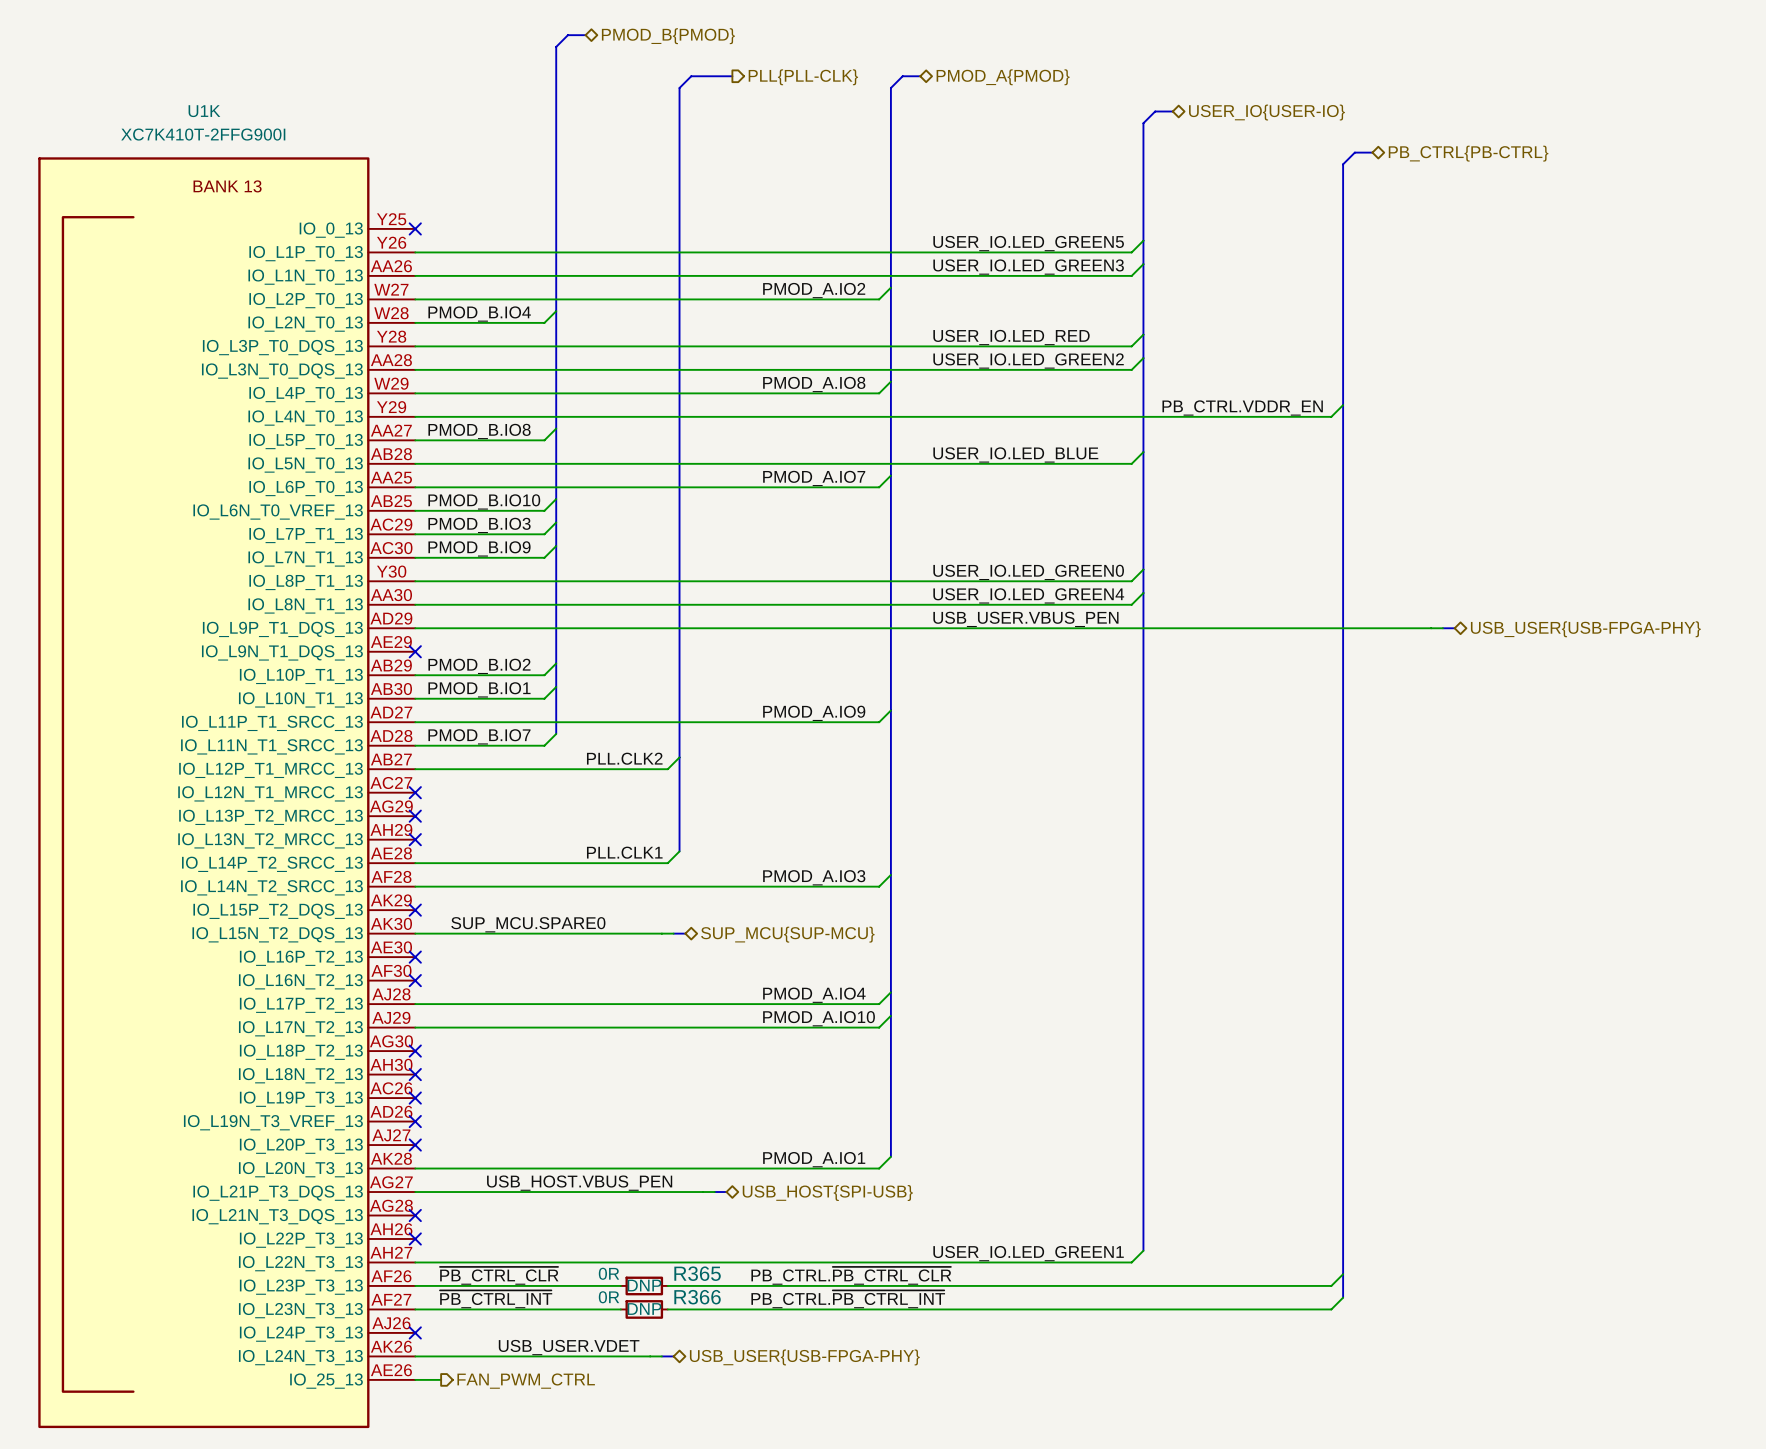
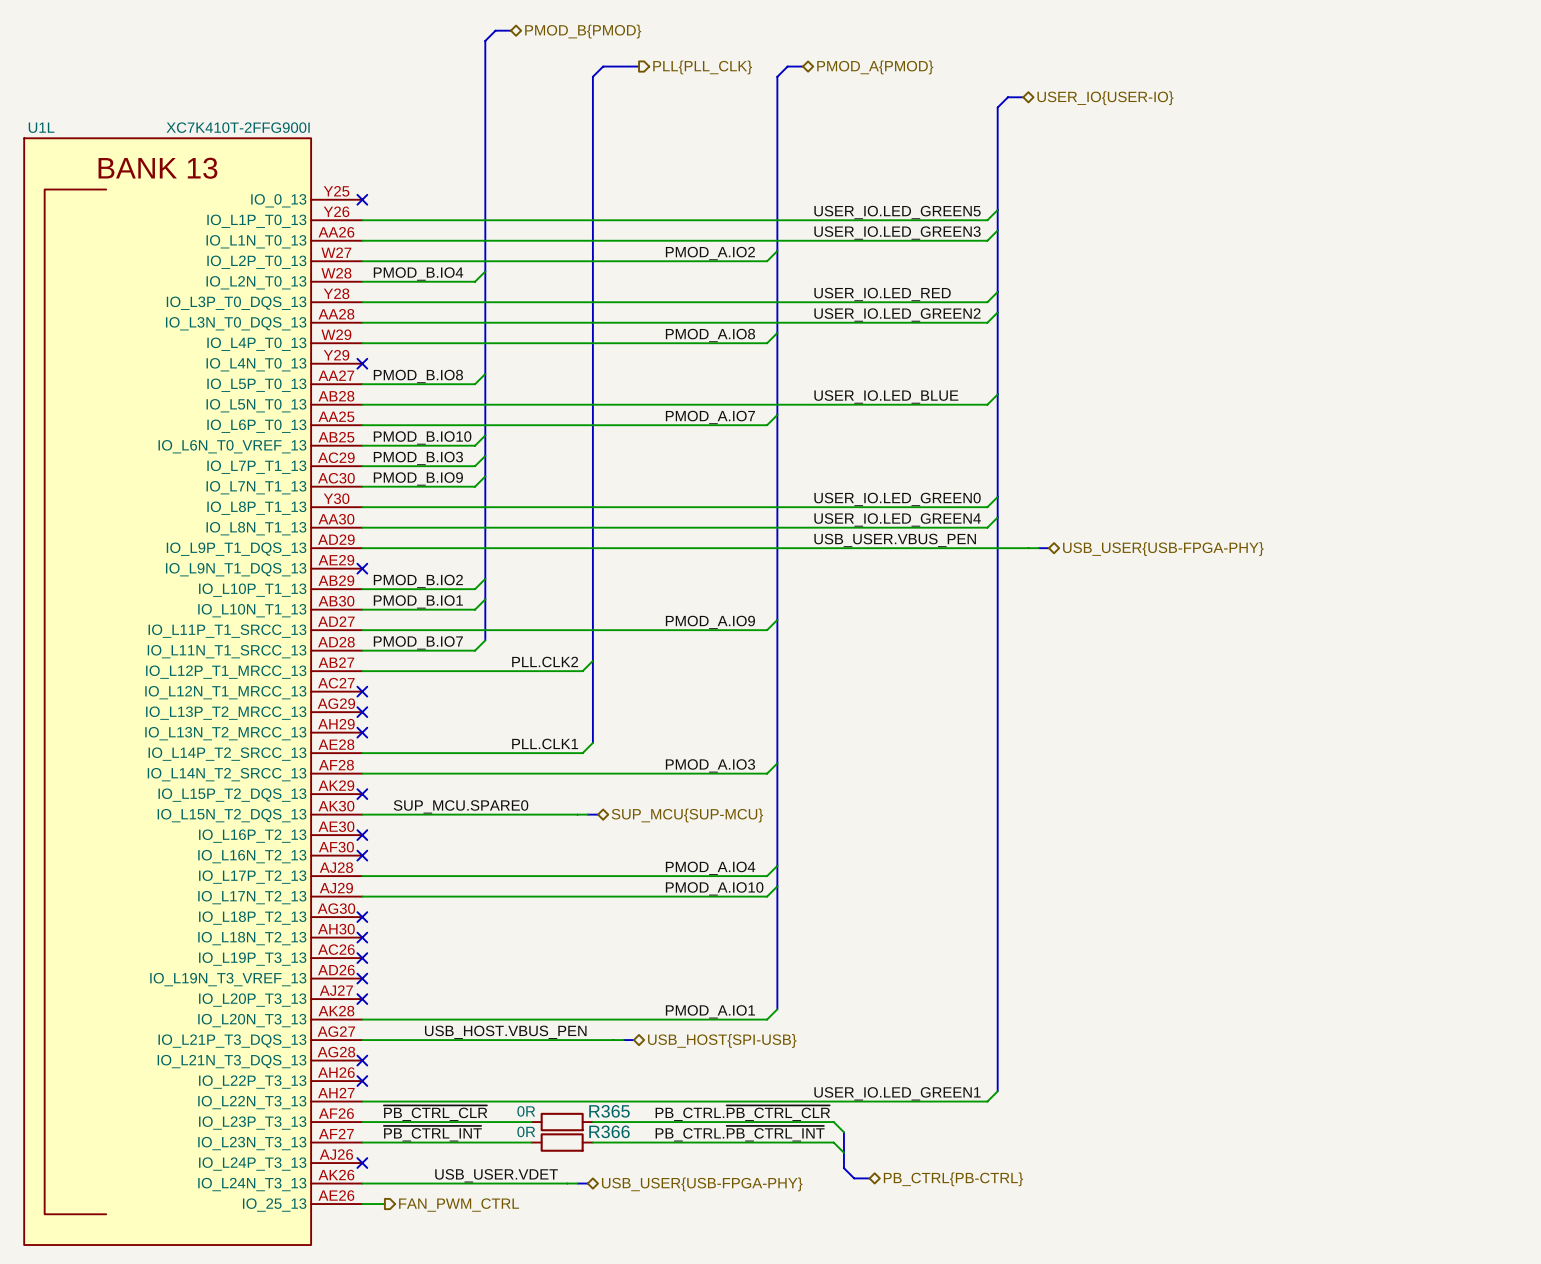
hierarchical label: PLL{PLL-CLK} (803, 77) -> PLL{PLL_CLK} (702, 67)
bus: (1372, 152) (1354, 152) (1343, 164) (1343, 1297) -> none
hierarchical label: PB_CTRL{PB-CTRL} (1468, 153) -> none
wire: (1343, 405) (1331, 416) (415, 416) -> none
label: PB_CTRL.VDDR_EN (1242, 407) -> none
no-connect mark: none -> (362, 363)
wire: (1190, 628) (1442, 628) -> none
bus: none -> (1038, 548) (1048, 548)
bus: (1442, 628) (1454, 628) -> none
hierarchical label: none -> USB_USER{USB-FPGA-PHY} (1163, 549)
hierarchical label: USB_USER{USB-FPGA-PHY} (1585, 629) -> none
U1L: none -> XC7K410T-2FFG900I (192, 691)
U1K: XC7K410T-2FFG900I (226, 792) -> none
wire: (1343, 1274) (1331, 1285) (955, 1285) -> (843, 1132) (833, 1122)
R365 symbol: [620, 1276, 668, 1296] -> [531, 1112, 593, 1132]
R365 text: DNP (644, 1285) -> none
bus: none -> (843, 1132) (843, 1168) (854, 1178) (869, 1178)
wire: (1343, 1297) (1331, 1309) (955, 1309) -> (843, 1152) (833, 1142)
R366 symbol: [620, 1300, 668, 1319] -> [531, 1133, 593, 1152]
R366 text: DNP (644, 1309) -> none
hierarchical label: none -> PB_CTRL{PB-CTRL} (953, 1179)

